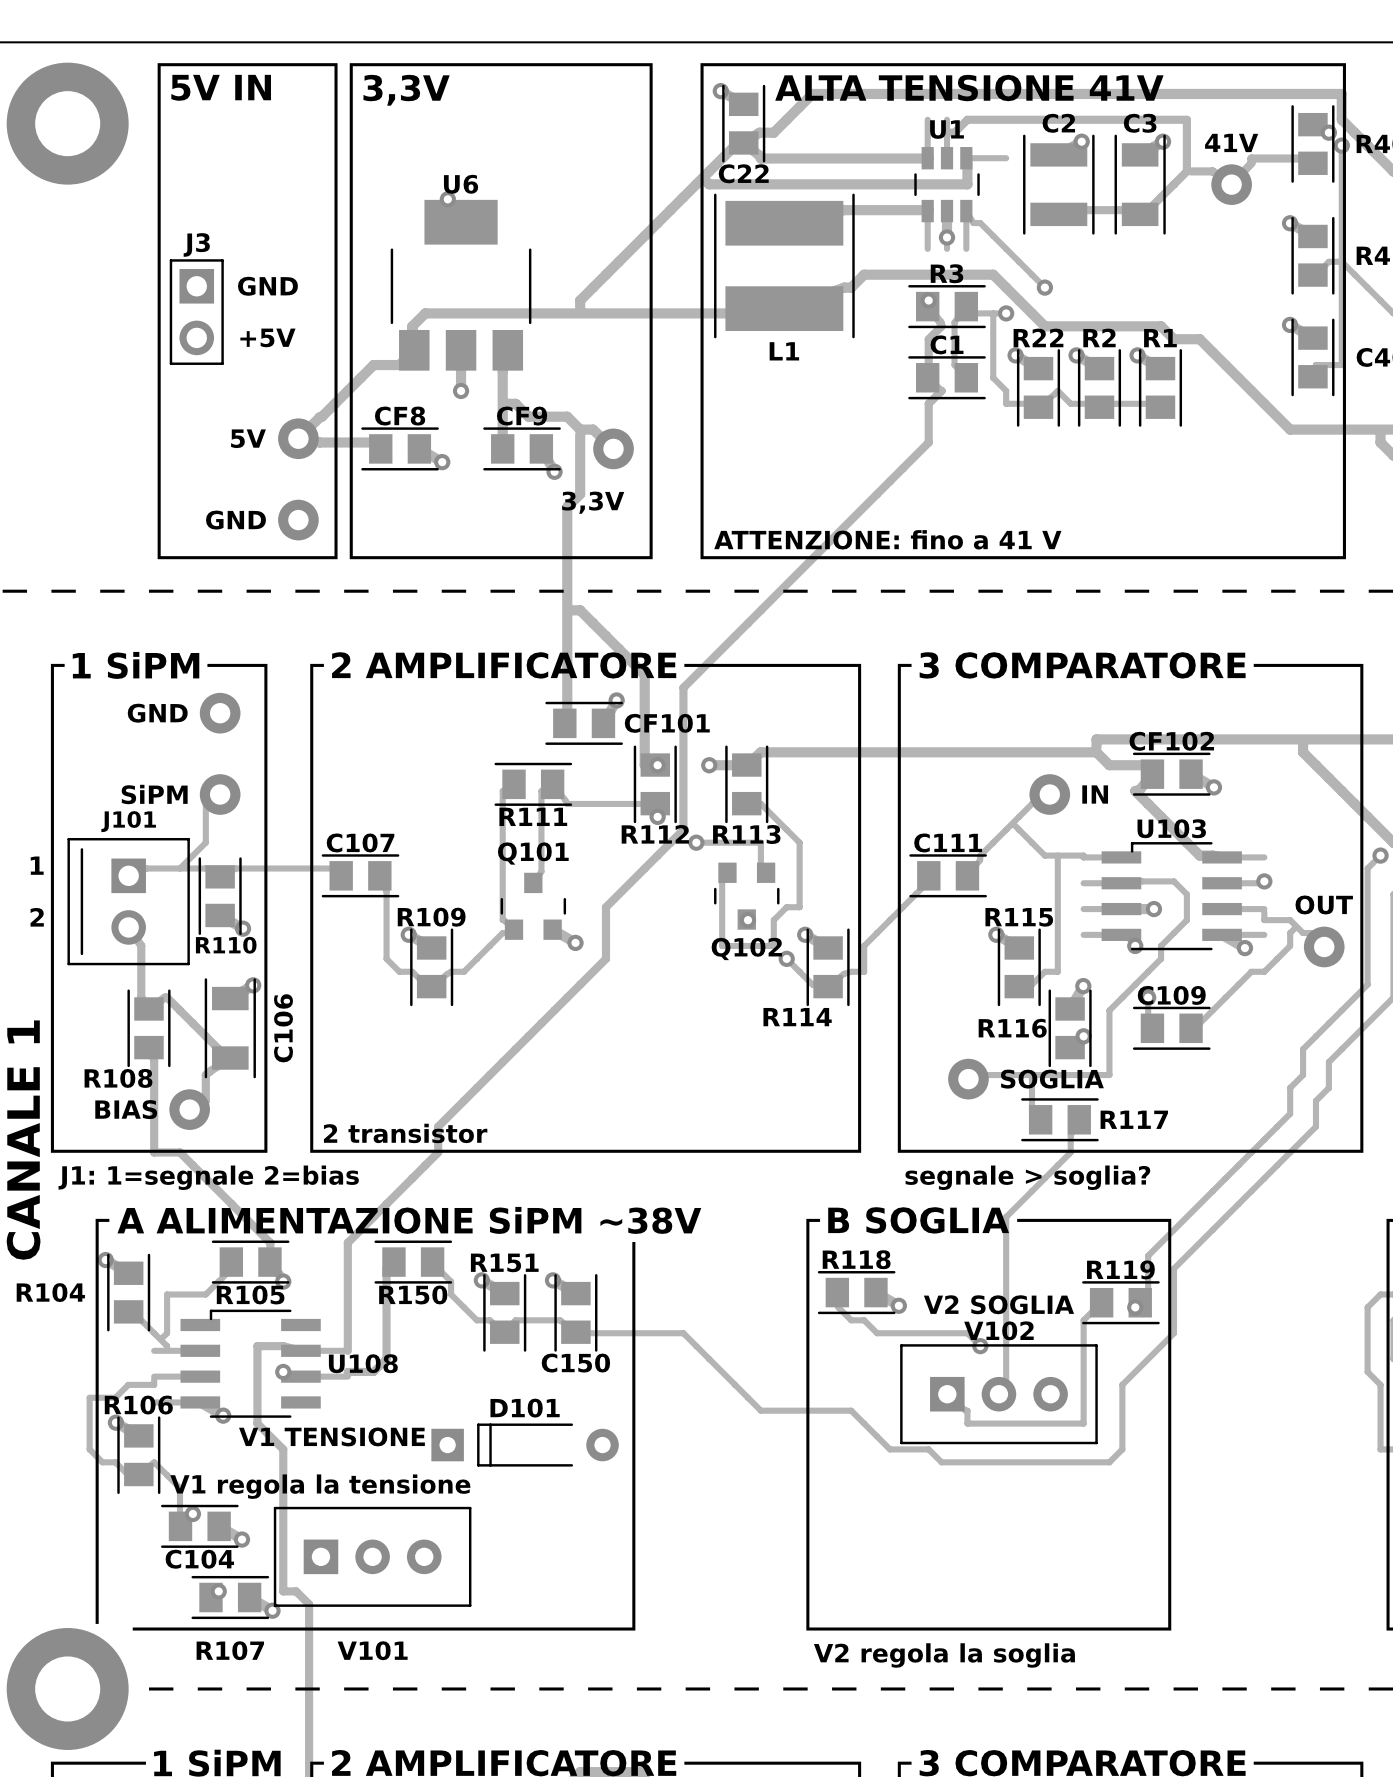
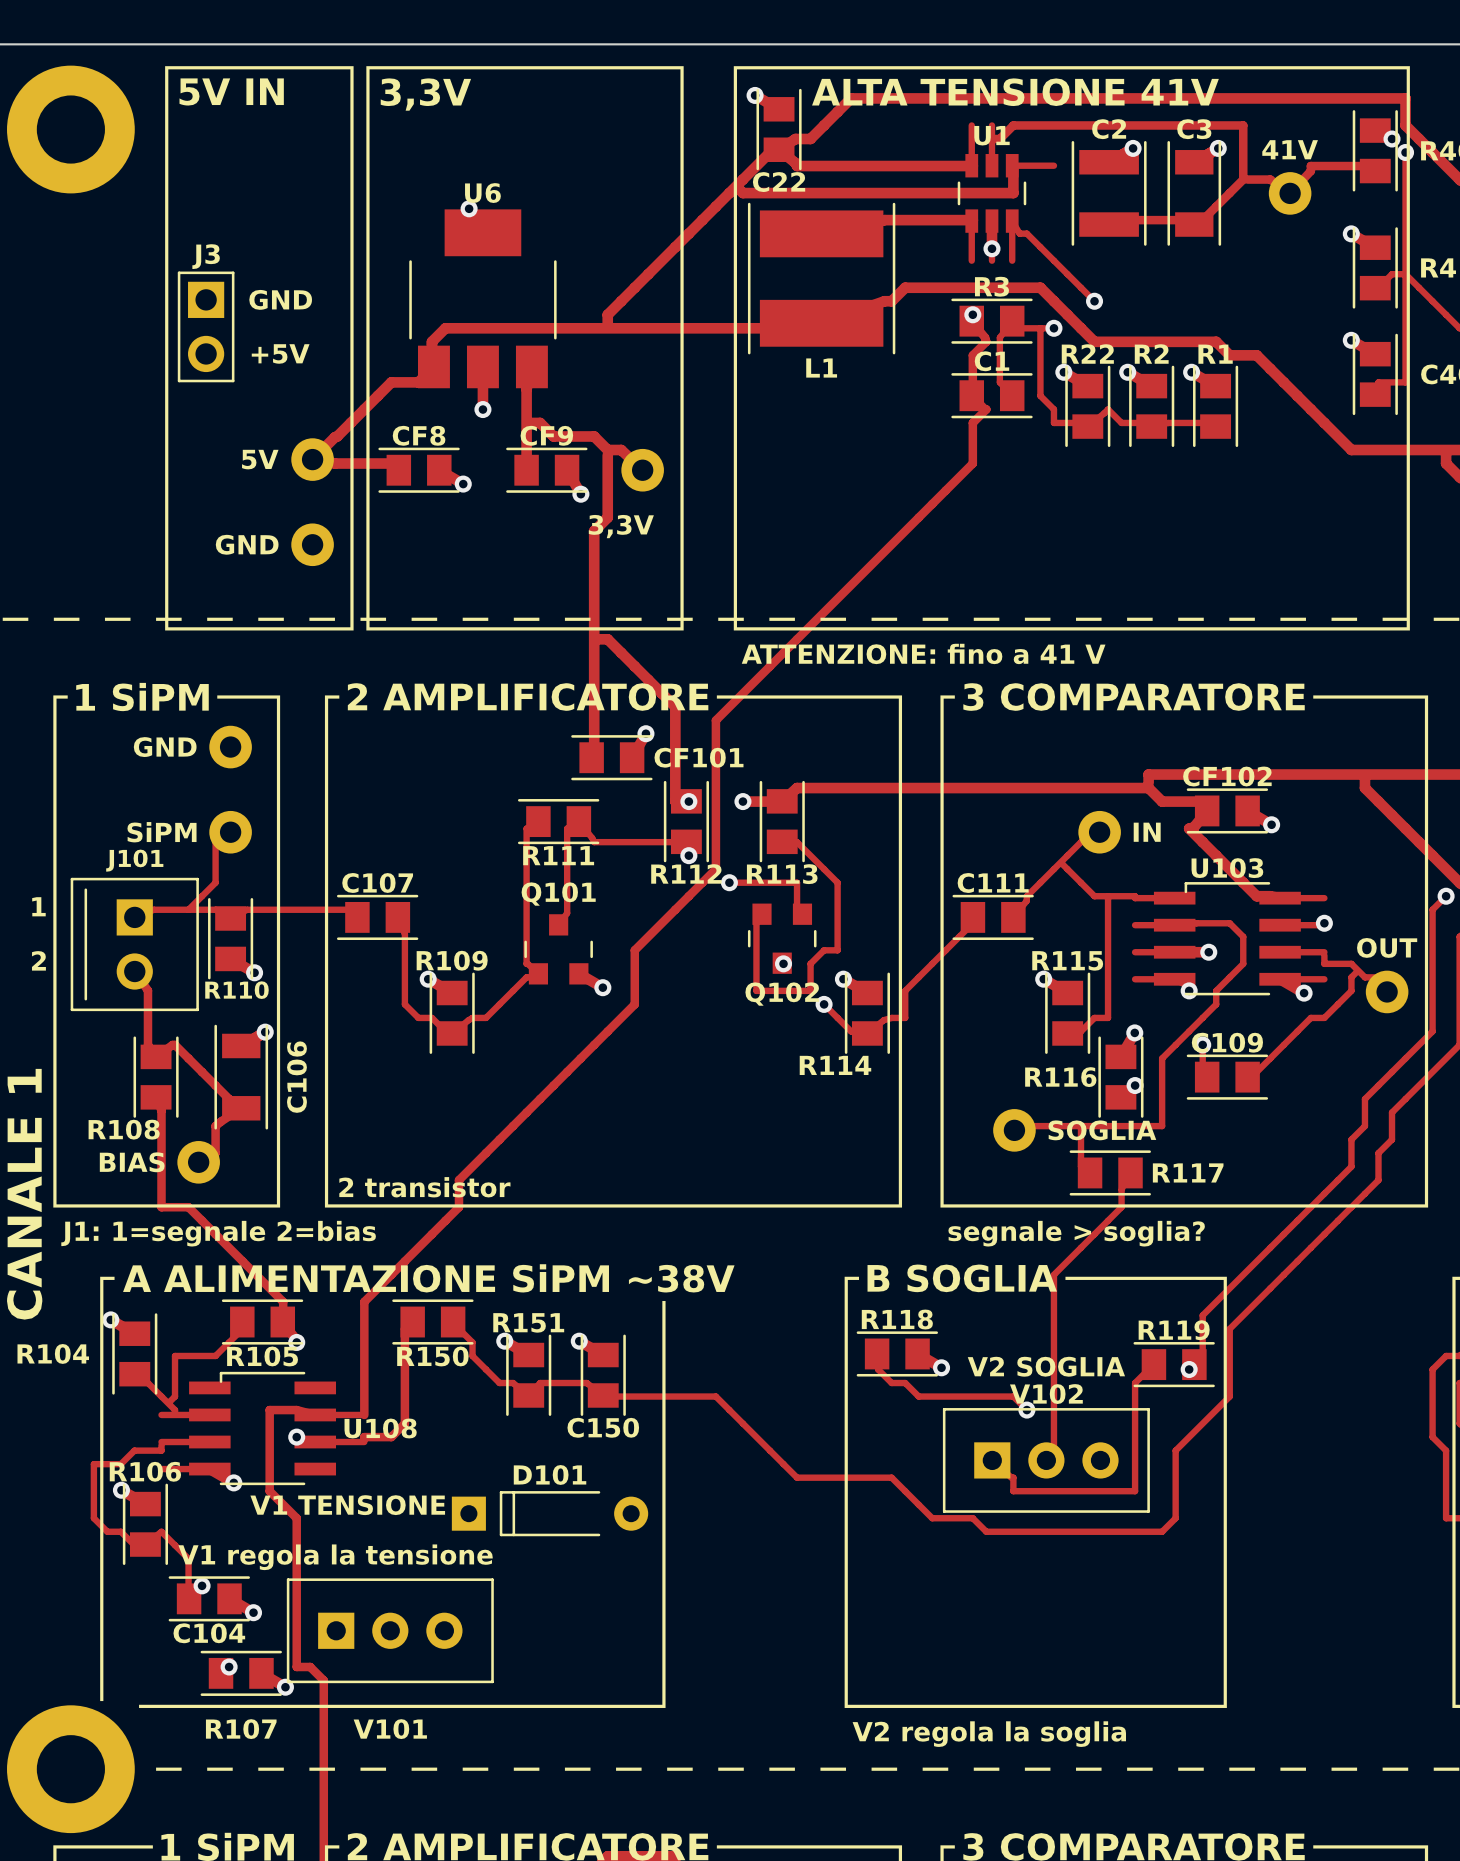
drawing: none -> [156, 66, 1410, 664]
drawing: [157, 63, 653, 560] -> none
drawing: [700, 63, 1346, 560] -> none
drawing position: (924, 531) -> (962, 645)
drawing position: (977, 537) -> (1018, 651)
drawing position: (918, 539) -> (956, 653)
drawing position: (1002, 539) -> (1044, 653)
drawing position: (719, 540) -> (746, 654)
drawing position: (728, 540) -> (756, 654)
drawing position: (813, 540) -> (845, 654)
drawing position: (827, 540) -> (860, 654)
drawing position: (838, 540) -> (871, 654)
drawing position: (847, 540) -> (881, 654)
drawing position: (1010, 540) -> (1052, 654)
drawing position: (1025, 540) -> (1067, 654)
drawing position: (1051, 540) -> (1095, 654)
drawing position: (937, 542) -> (976, 656)
drawing position: (951, 542) -> (990, 656)
drawing position: (959, 542) -> (998, 656)
drawing position: (984, 542) -> (1024, 656)
drawing position: (977, 544) -> (1017, 659)
drawing: [148, 589, 174, 593] -> none
drawing: [344, 589, 369, 593] -> none
drawing: [636, 589, 711, 593] -> none
drawing: [1319, 589, 1345, 593] -> none

